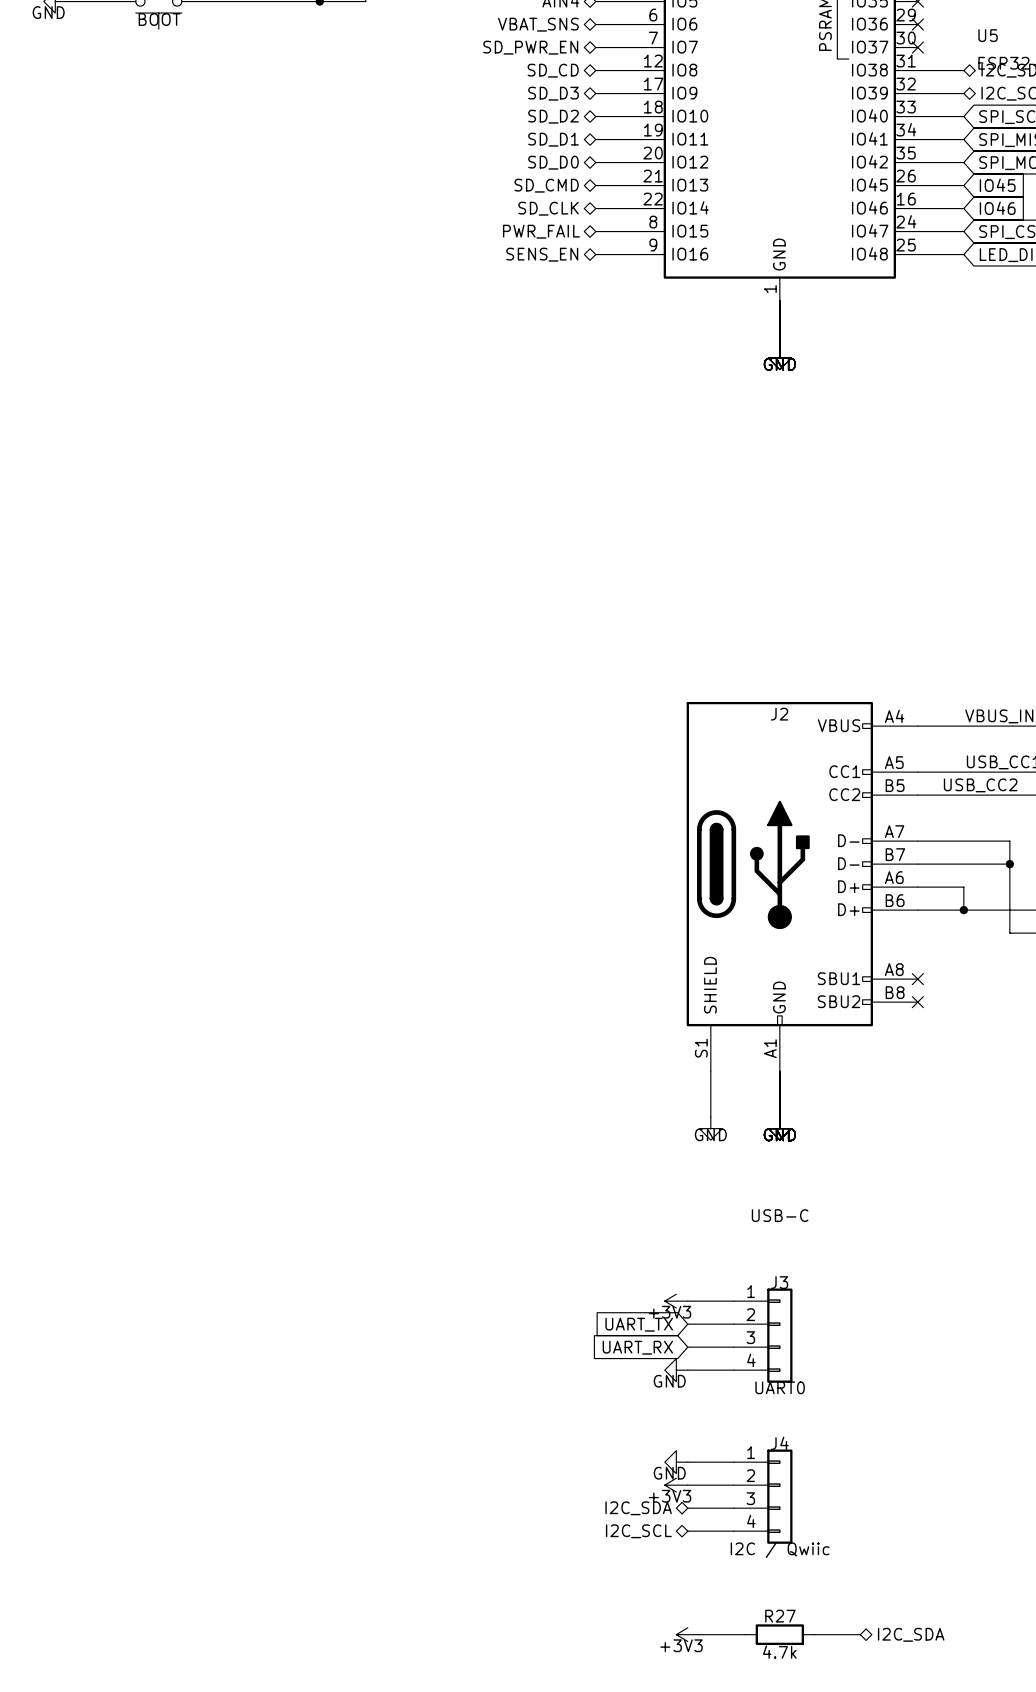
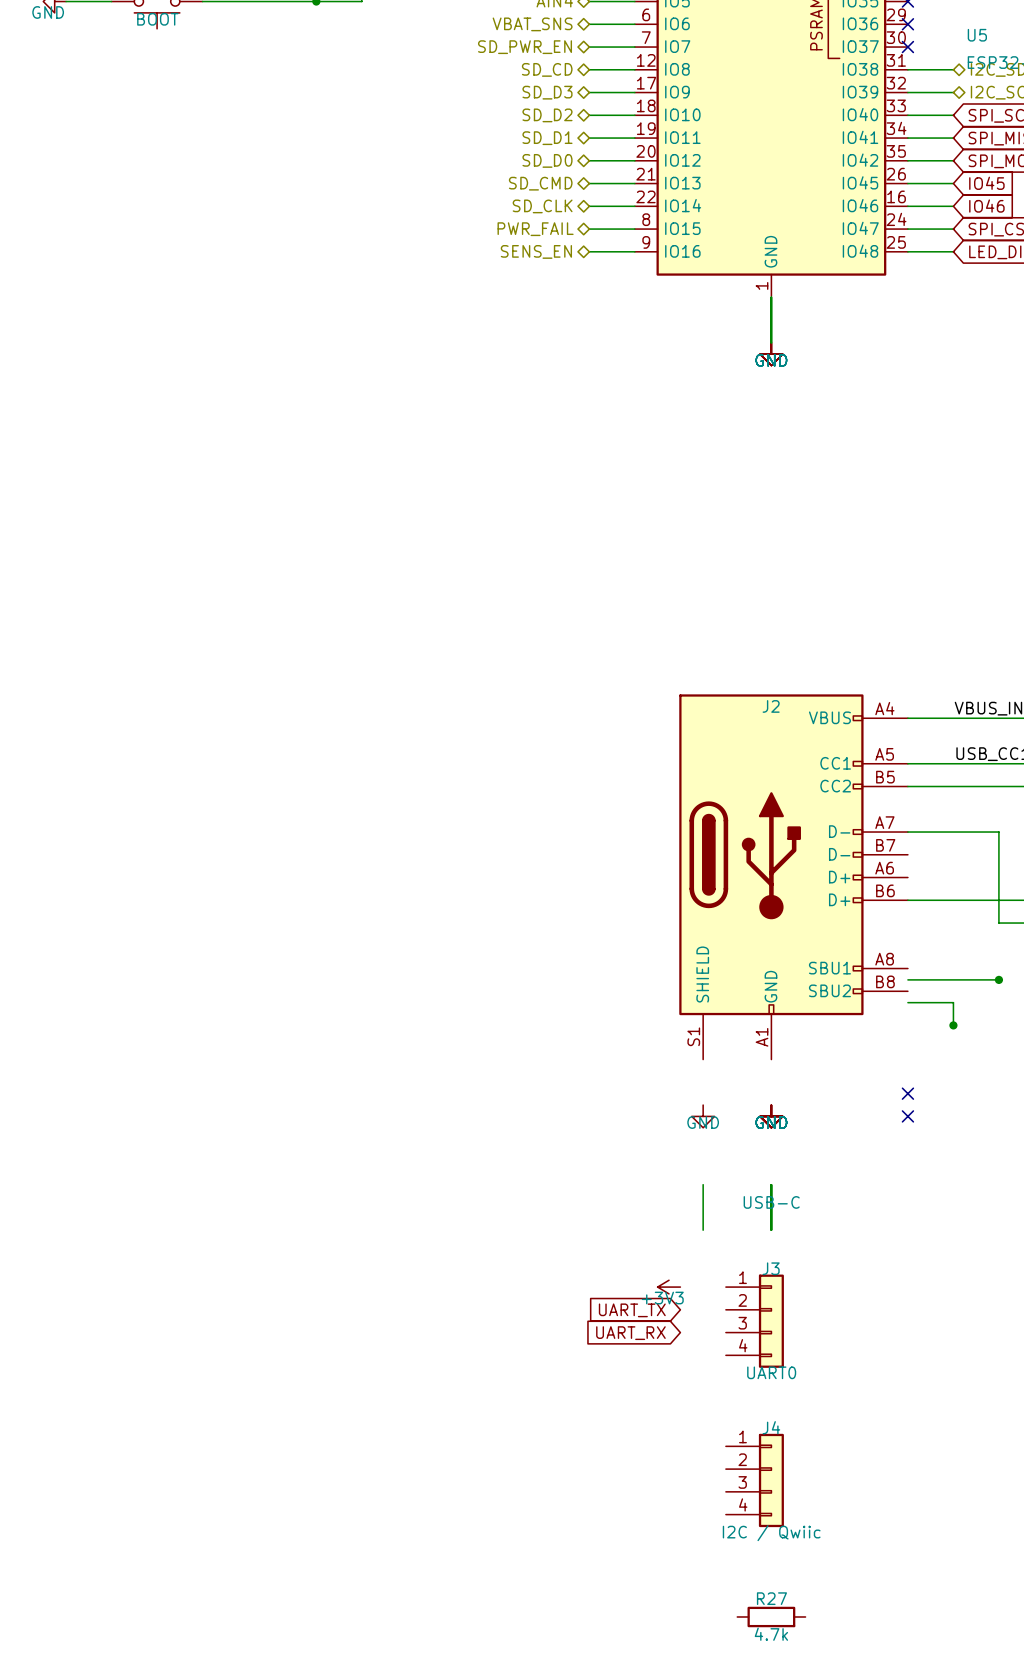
label: USB_CC2 (980, 785) -> none
wire: (917, 864) (1009, 864) -> (907, 979) (998, 979)
junction: (1009, 864) -> none
wire: (917, 887) (963, 887) (963, 910) -> (907, 1002) (953, 1002) (953, 1025)
junction: (963, 910) -> none
no-connect mark: (917, 979) -> none
junction: none -> (998, 979)
no-connect mark: (917, 1002) -> none
junction: none -> (953, 1025)
wire: (710, 1071) (710, 1117) -> (703, 1184) (703, 1230)
wire: (779, 1071) (779, 1117) -> (771, 1184) (771, 1230)
no-connect mark: none -> (907, 1093)
no-connect mark: none -> (907, 1116)
wire: (687, 1301) (733, 1301) -> none
wire: (687, 1324) (733, 1324) -> none
wire: (687, 1347) (733, 1347) -> none
power symbol: GND (676, 1370) -> none
wire: (687, 1370) (733, 1370) -> none
power symbol: GND (676, 1462) -> none
wire: (687, 1462) (733, 1462) -> none
power symbol: +3V3 (676, 1485) -> none
wire: (687, 1485) (733, 1485) -> none
hierarchical label: I2C_SDA (638, 1508) -> none
wire: (687, 1508) (733, 1508) -> none
hierarchical label: I2C_SCL (638, 1531) -> none
wire: (687, 1531) (733, 1531) -> none
power symbol: +3V3 (687, 1634) -> none
wire: (699, 1634) (745, 1634) -> none
wire: (814, 1634) (860, 1634) -> none
hierarchical label: I2C_SDA (911, 1634) -> none

